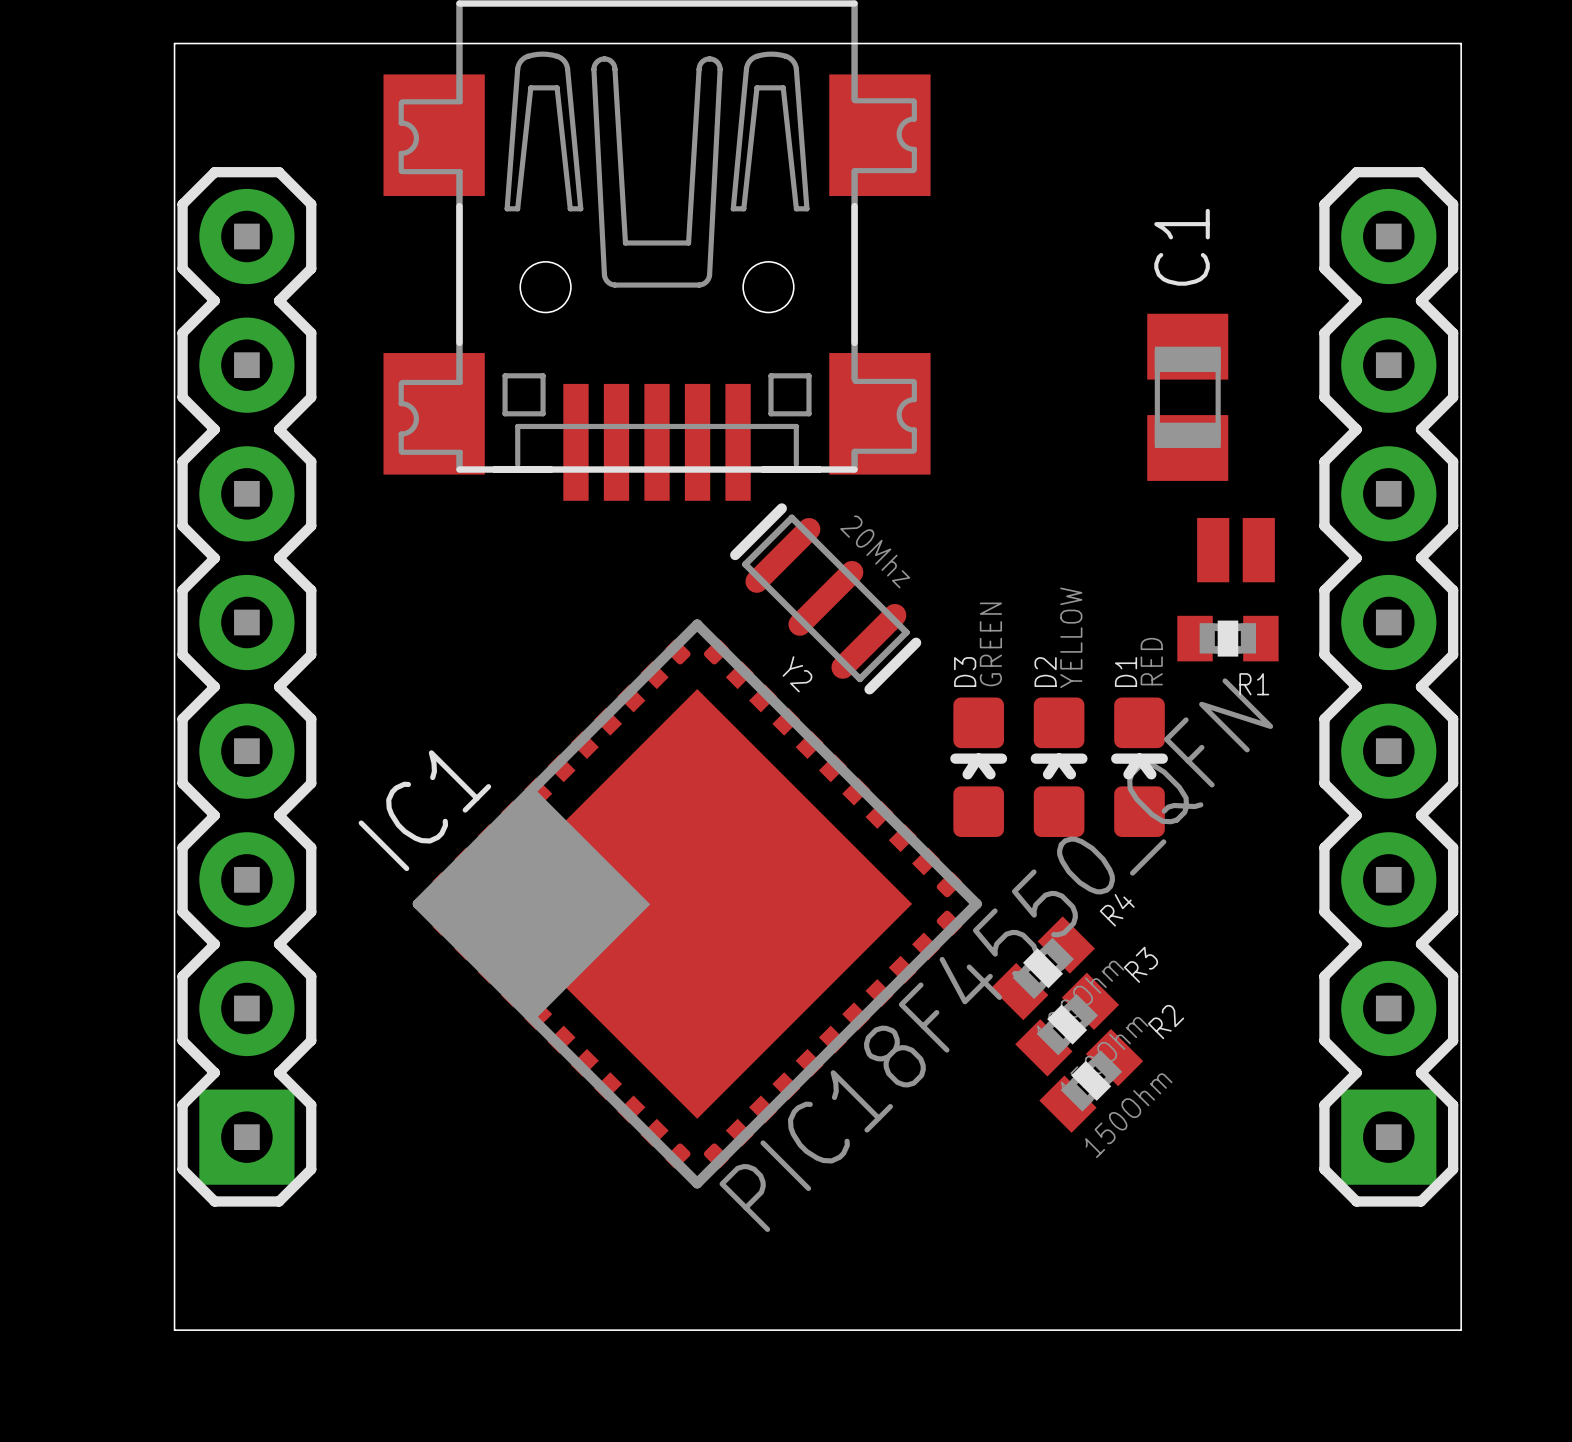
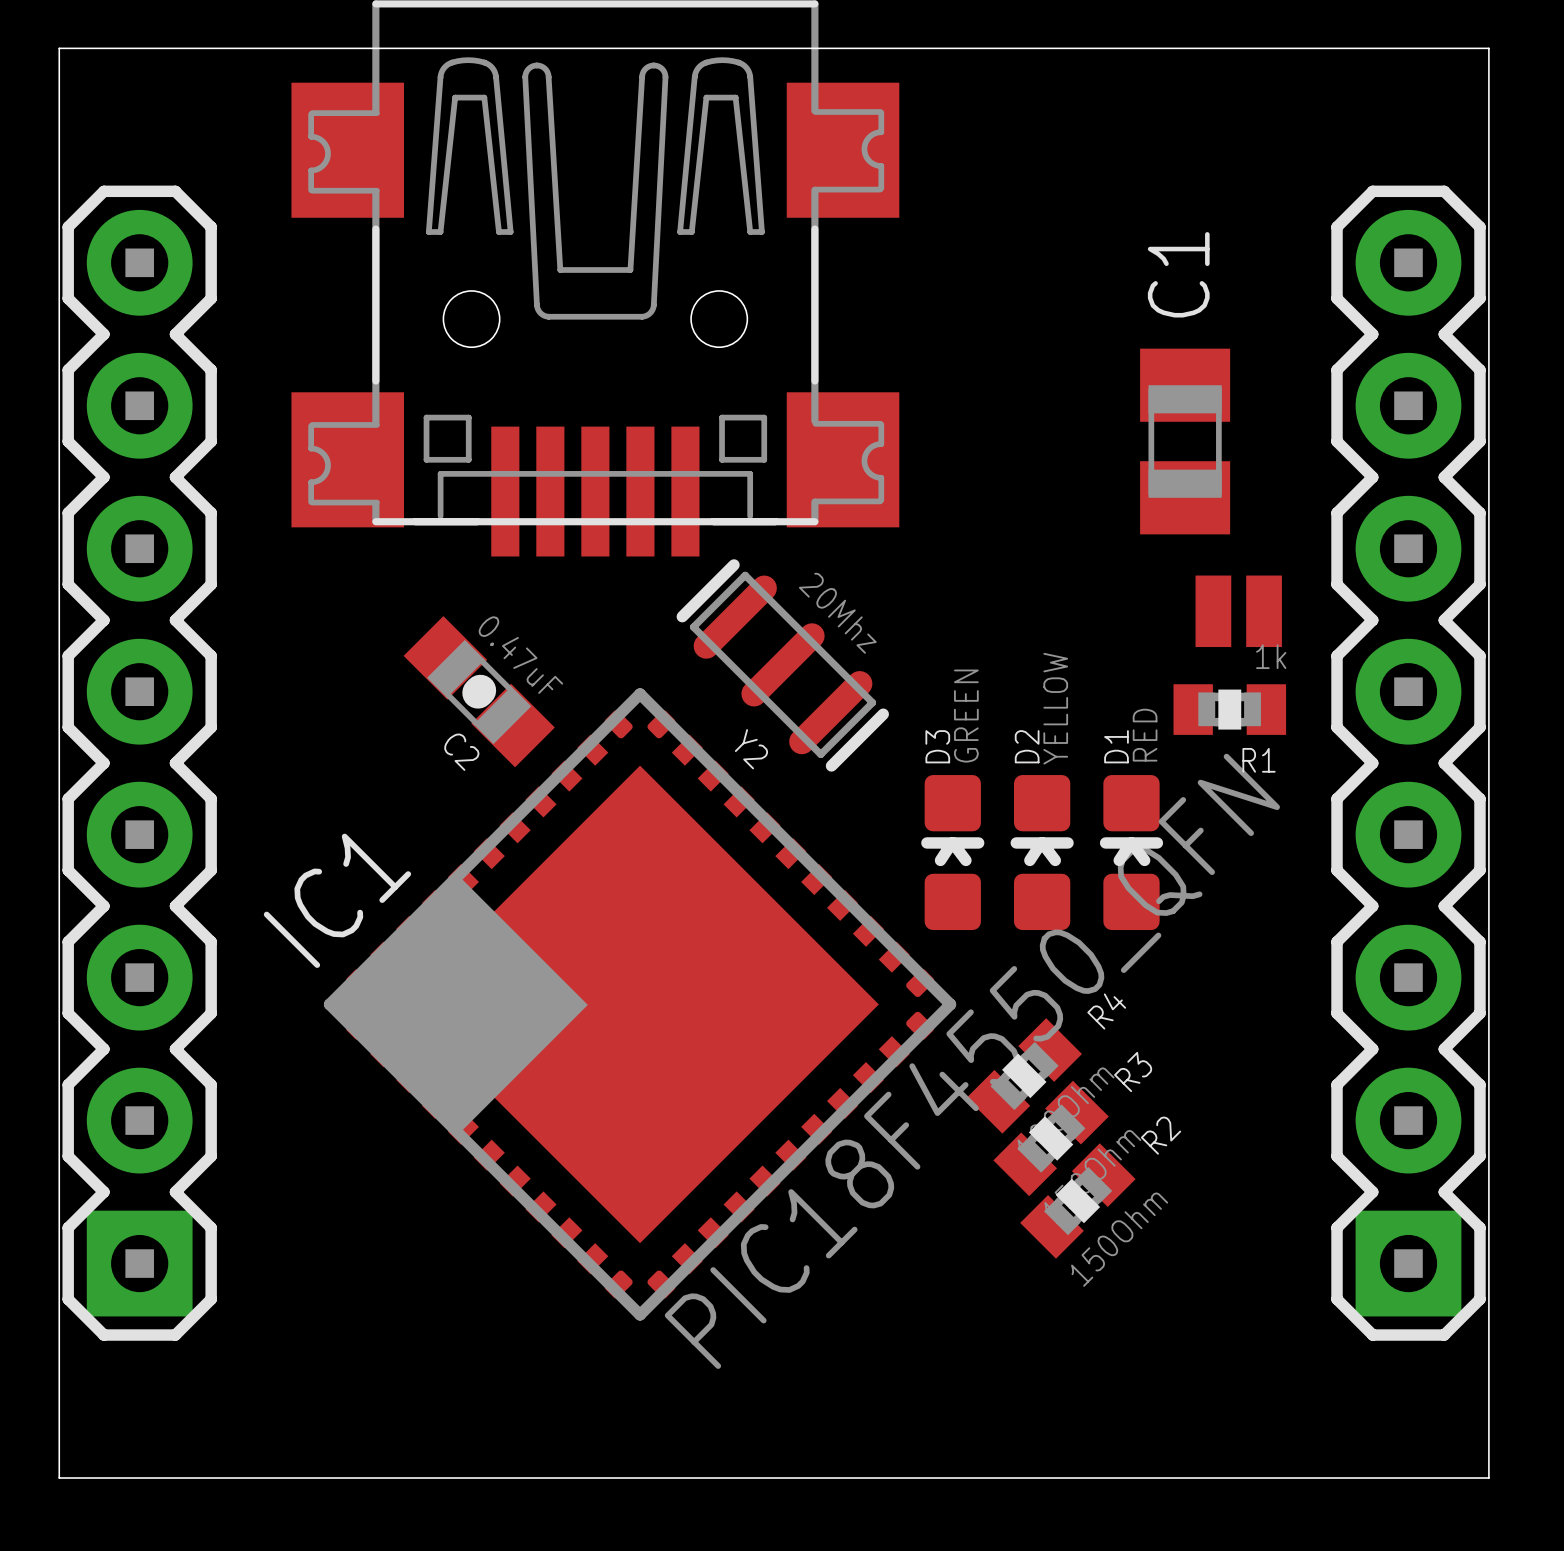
R1 value: none -> 1k (1271, 656)
C2: none -> 0.47uF (479, 691)

